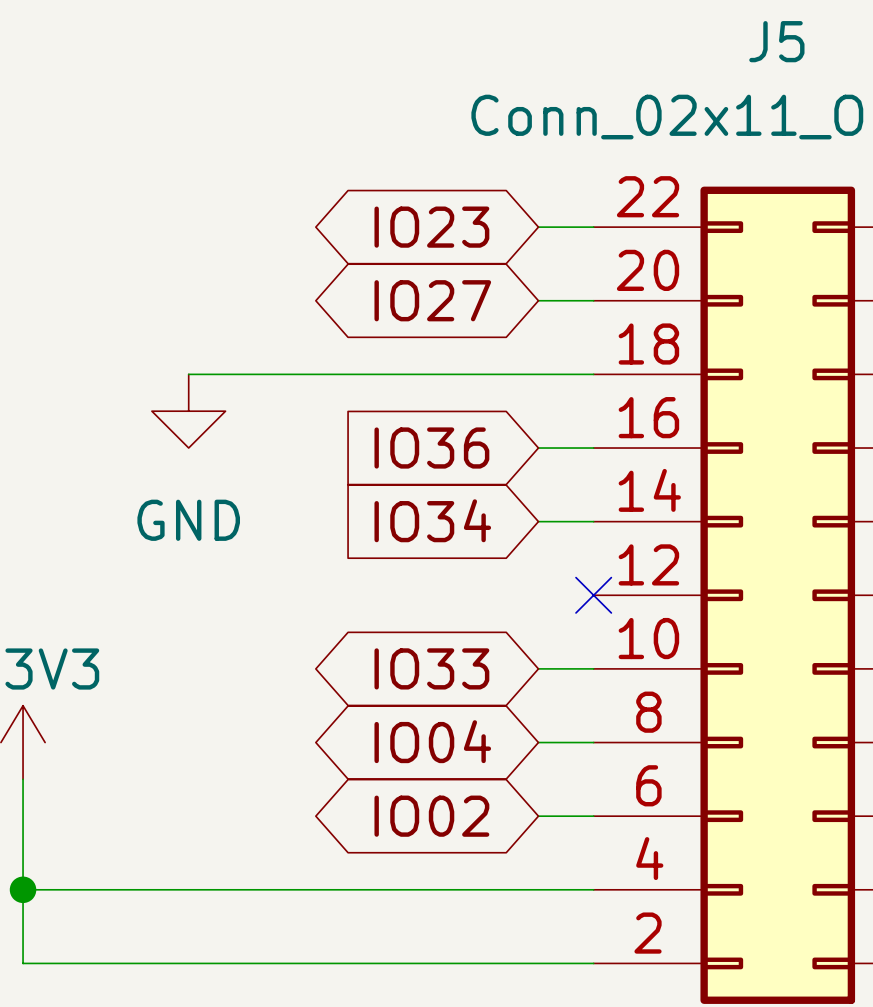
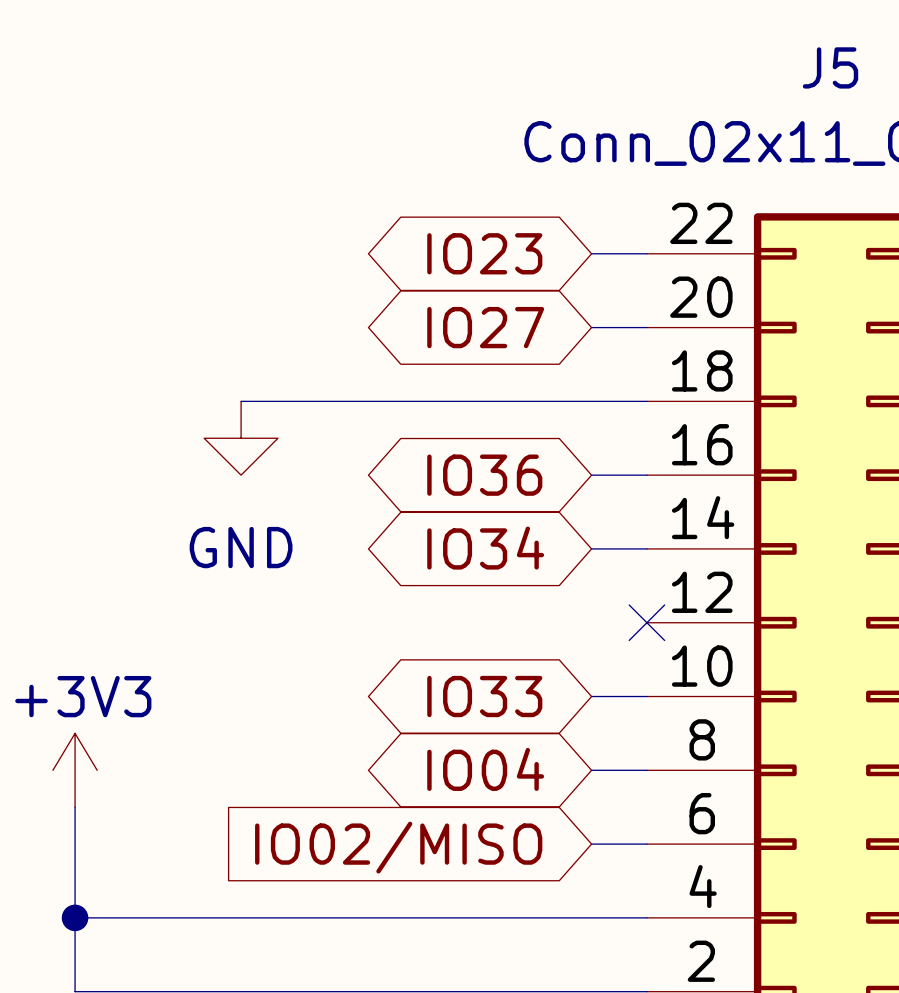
global label shape: input (431, 448) -> bidirectional (484, 475)
global label shape: input (432, 520) -> bidirectional (485, 548)
global label shape: bidirectional (431, 816) -> input (398, 847)
global label: IO02 (431, 816) -> IO02/MISO (398, 847)

